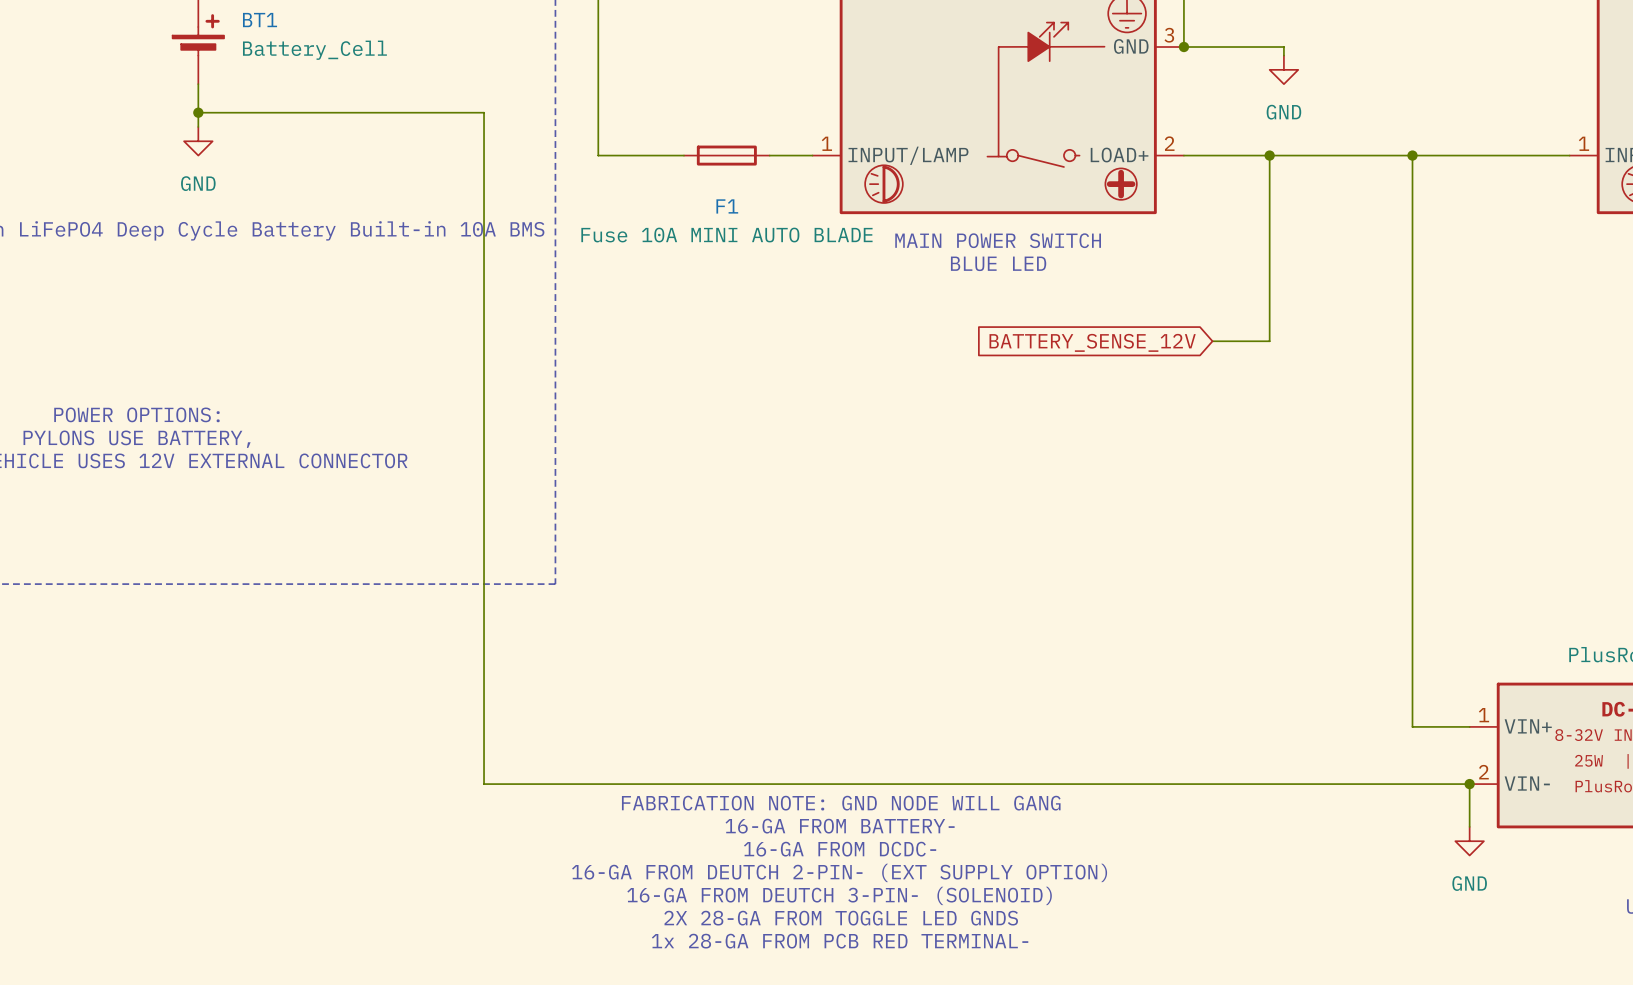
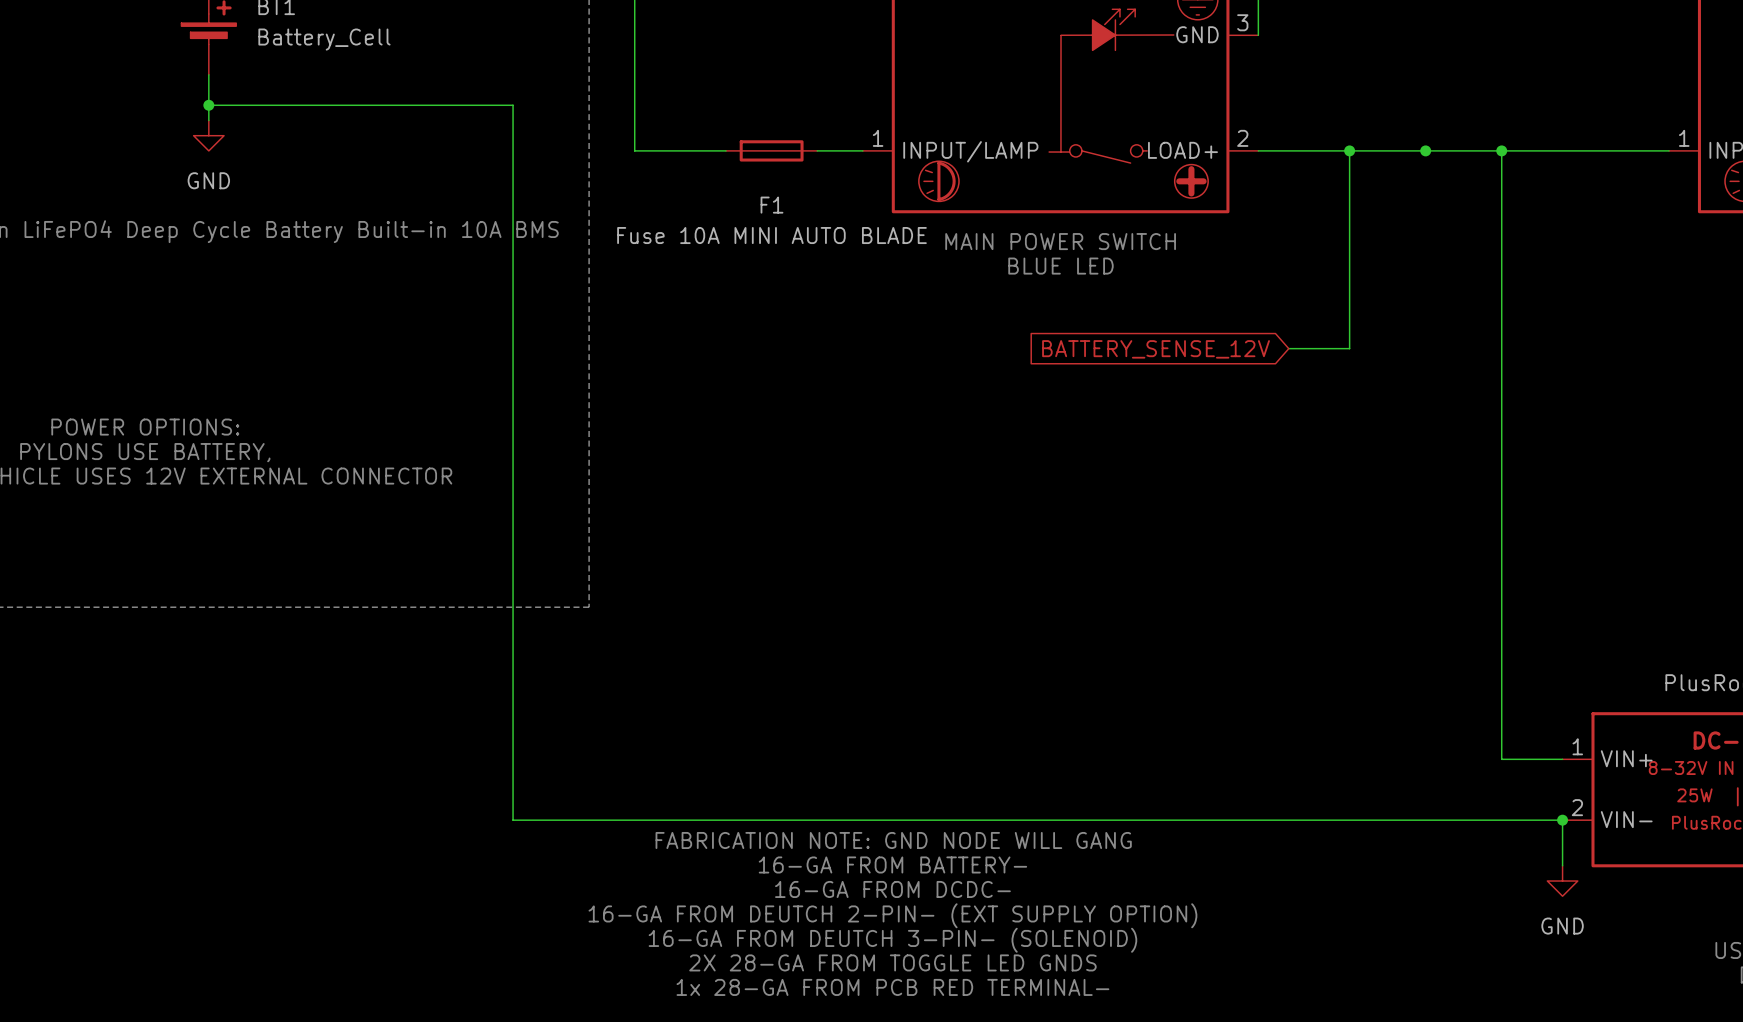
wire: (1183, 47) (1283, 47) (1283, 55) -> none
junction: (1183, 47) -> none
power symbol: GND (1283, 69) -> none
junction: none -> (1425, 150)

